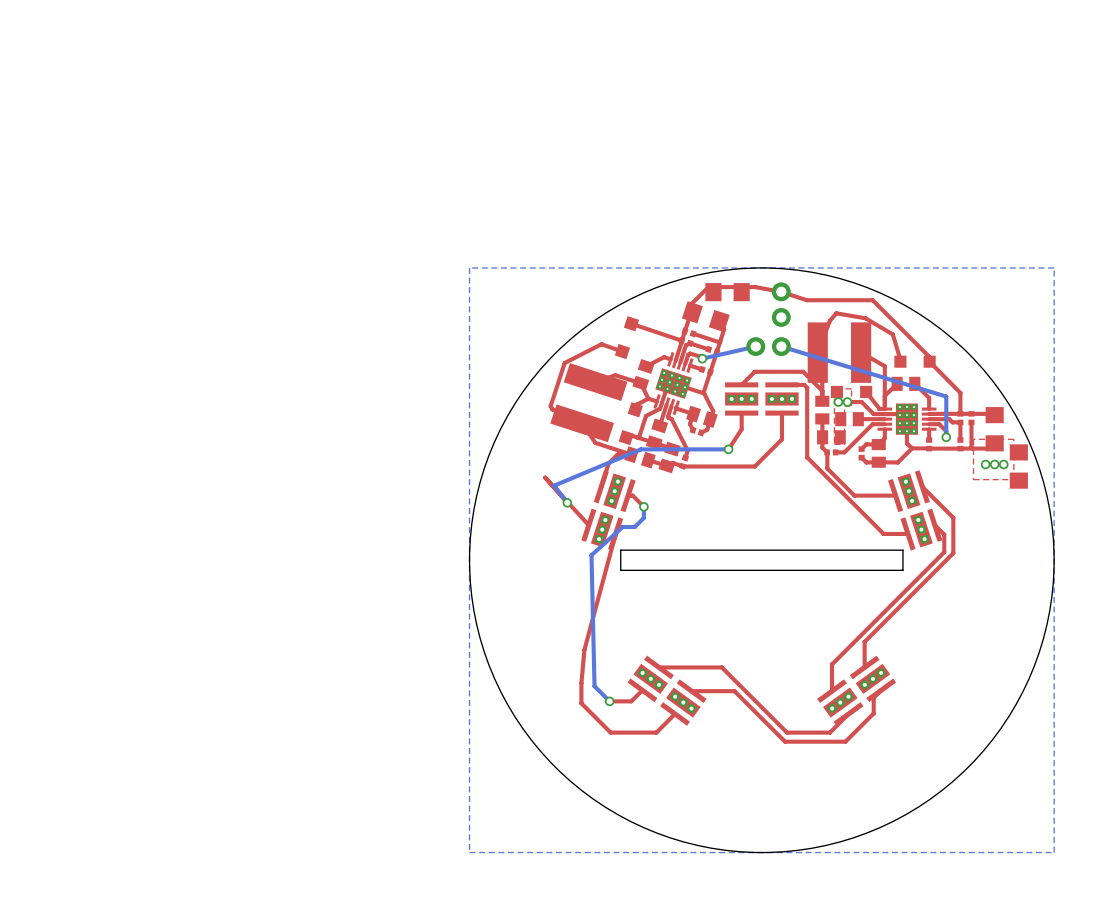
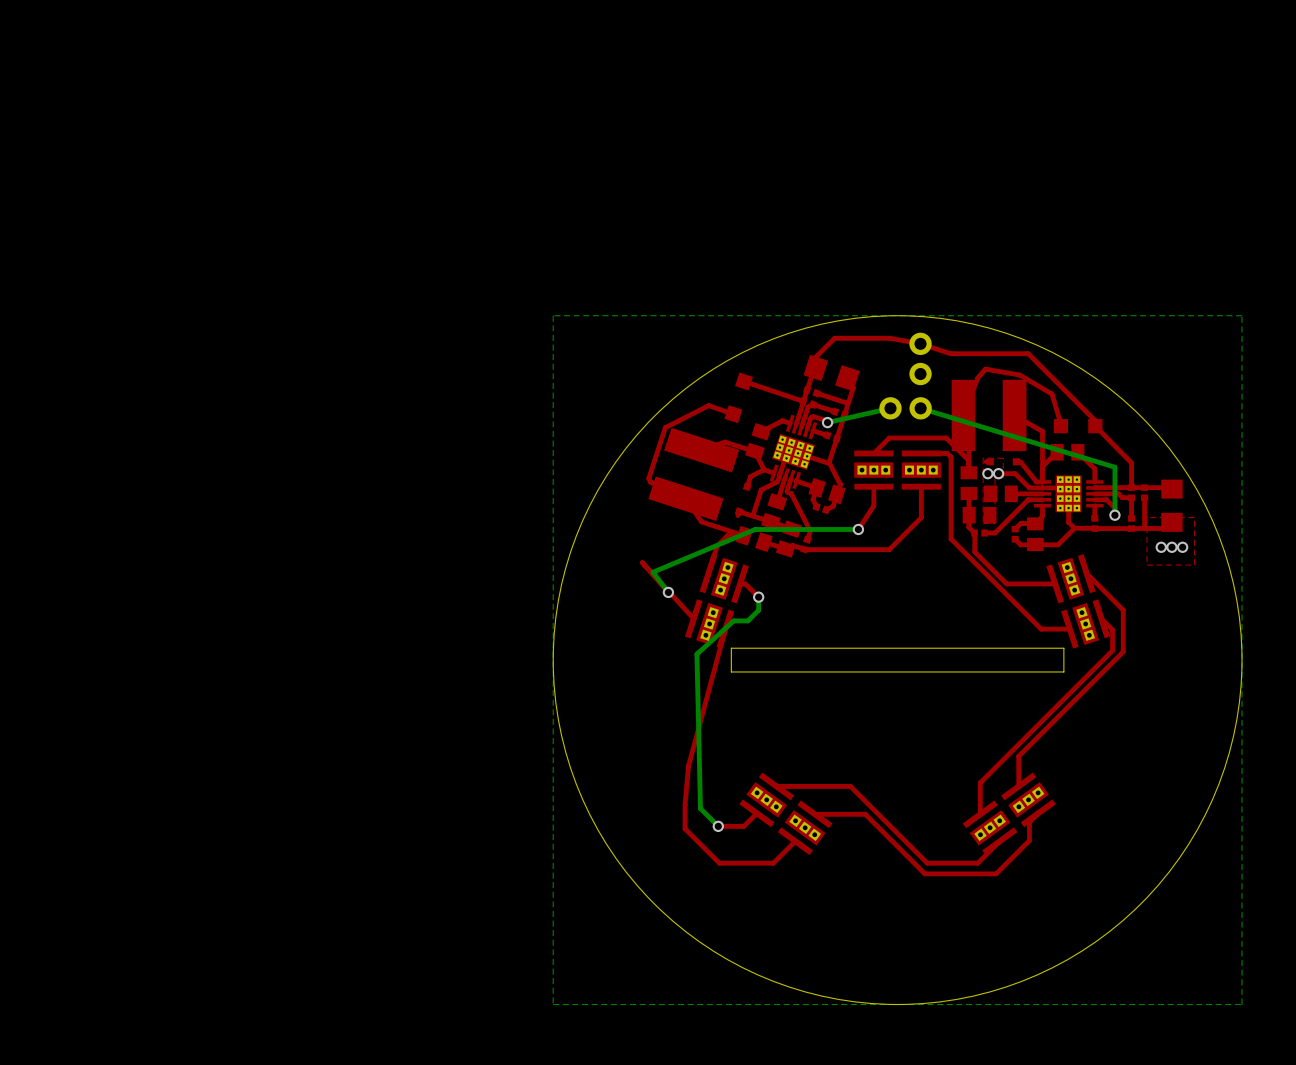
part: (727, 292) -> none
part footprint: [830, 385, 873, 398] -> [986, 458, 1020, 466]
part footprint: [618, 402, 643, 446] -> [734, 482, 752, 517]
part: (1018, 466) -> none

